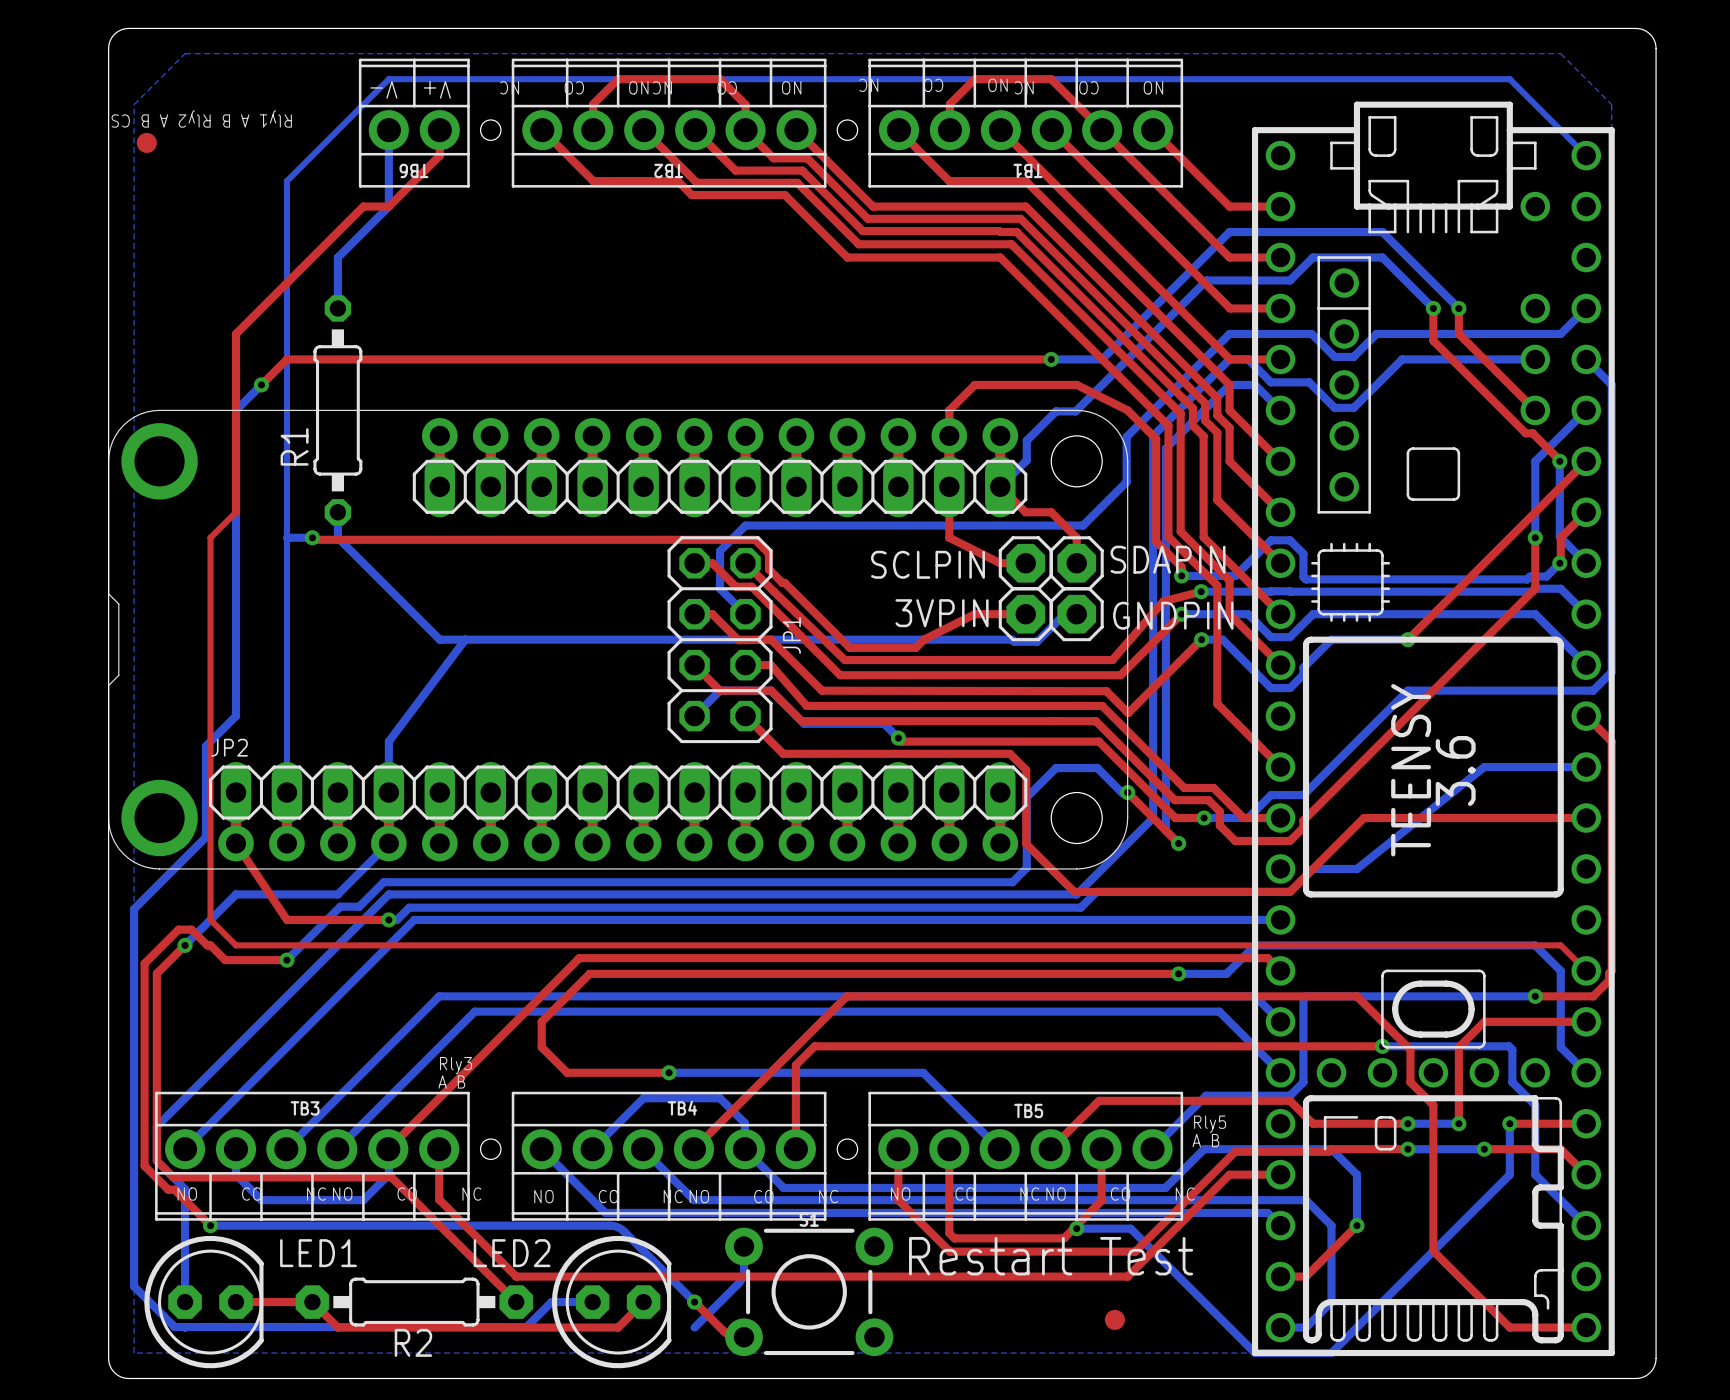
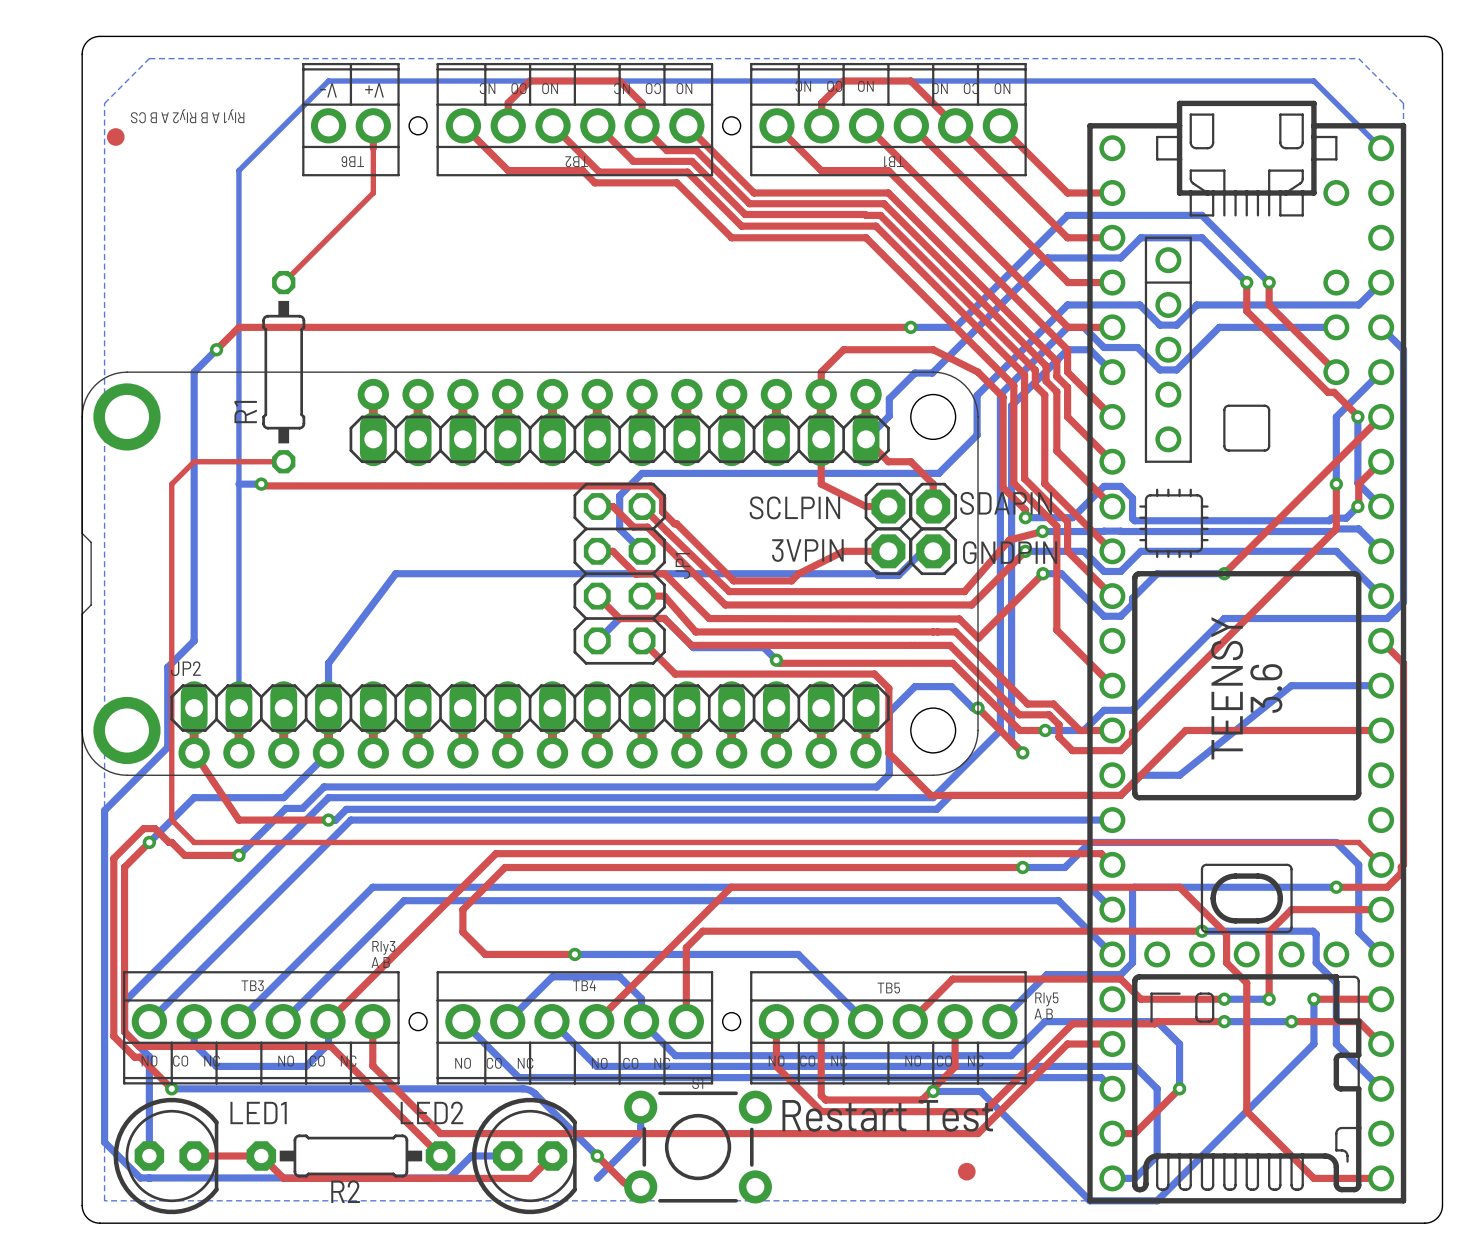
bottom track: (388, 130) (388, 206) (337, 257) (337, 308) -> none
top track: (439, 155) (388, 206) (363, 206) (236, 333) (236, 512) -> (373, 148) (373, 192) (283, 282)
top track: none -> (194, 461) (283, 461)
bottom track: (337, 512) (337, 537) (439, 639) (465, 639) -> none

